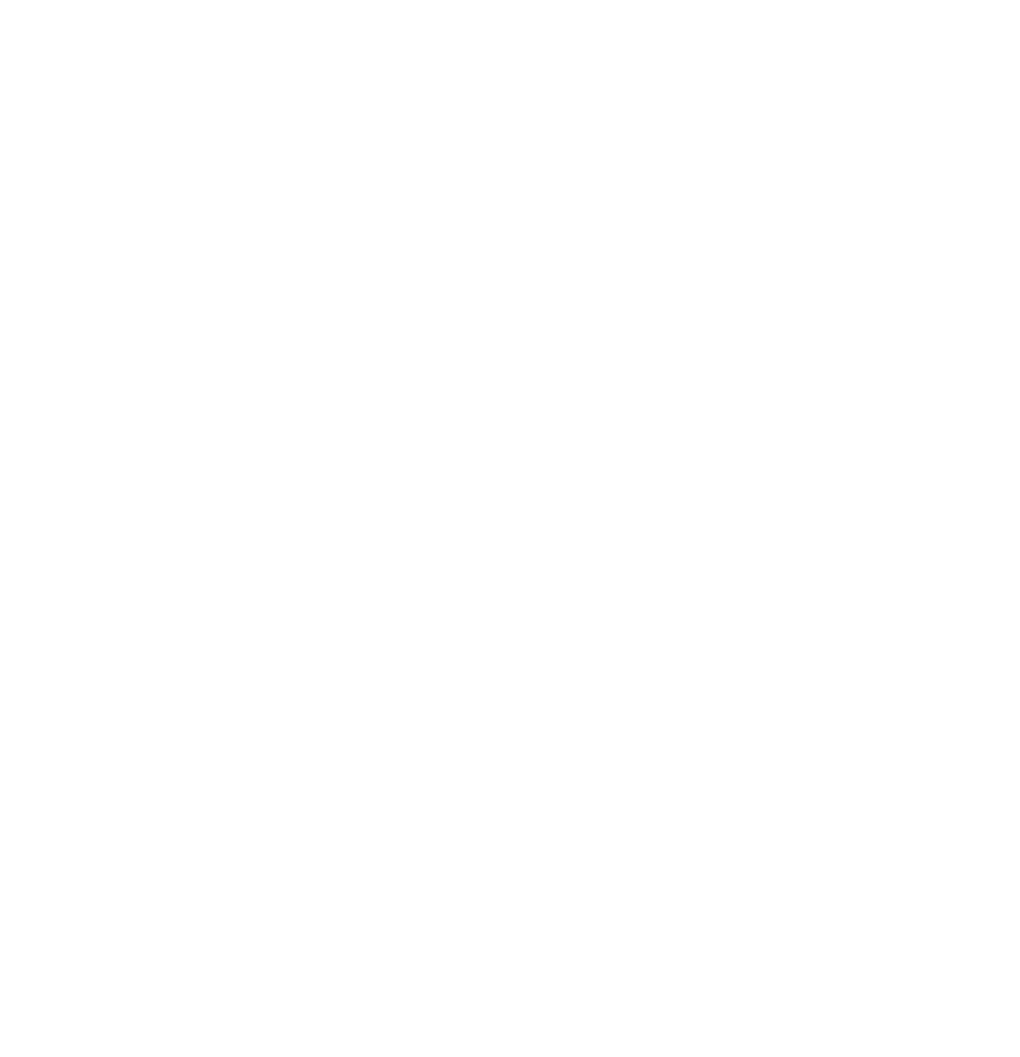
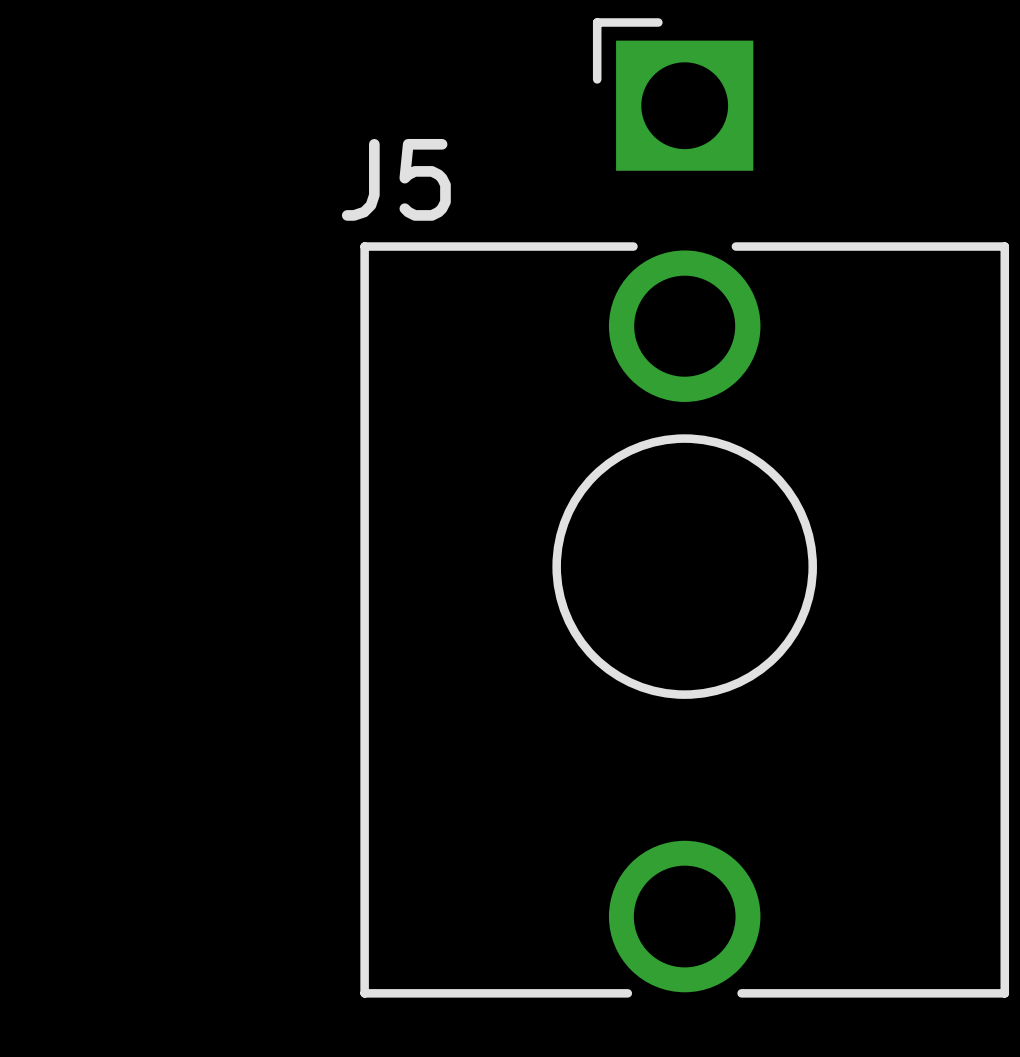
J5: none -> (684, 507)

